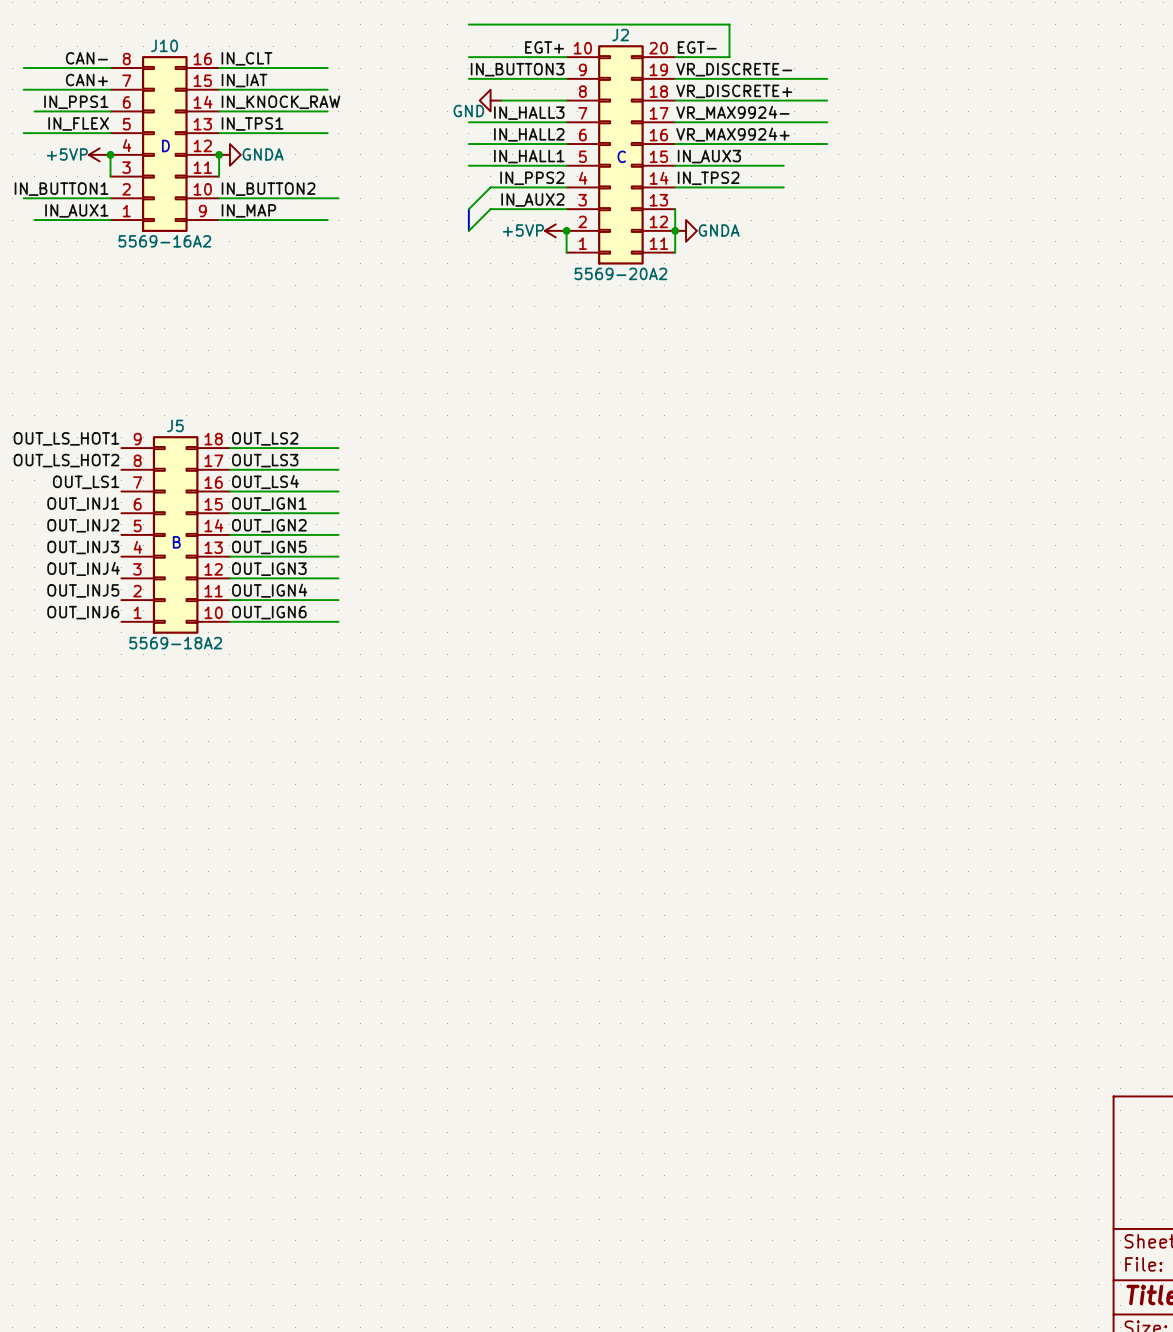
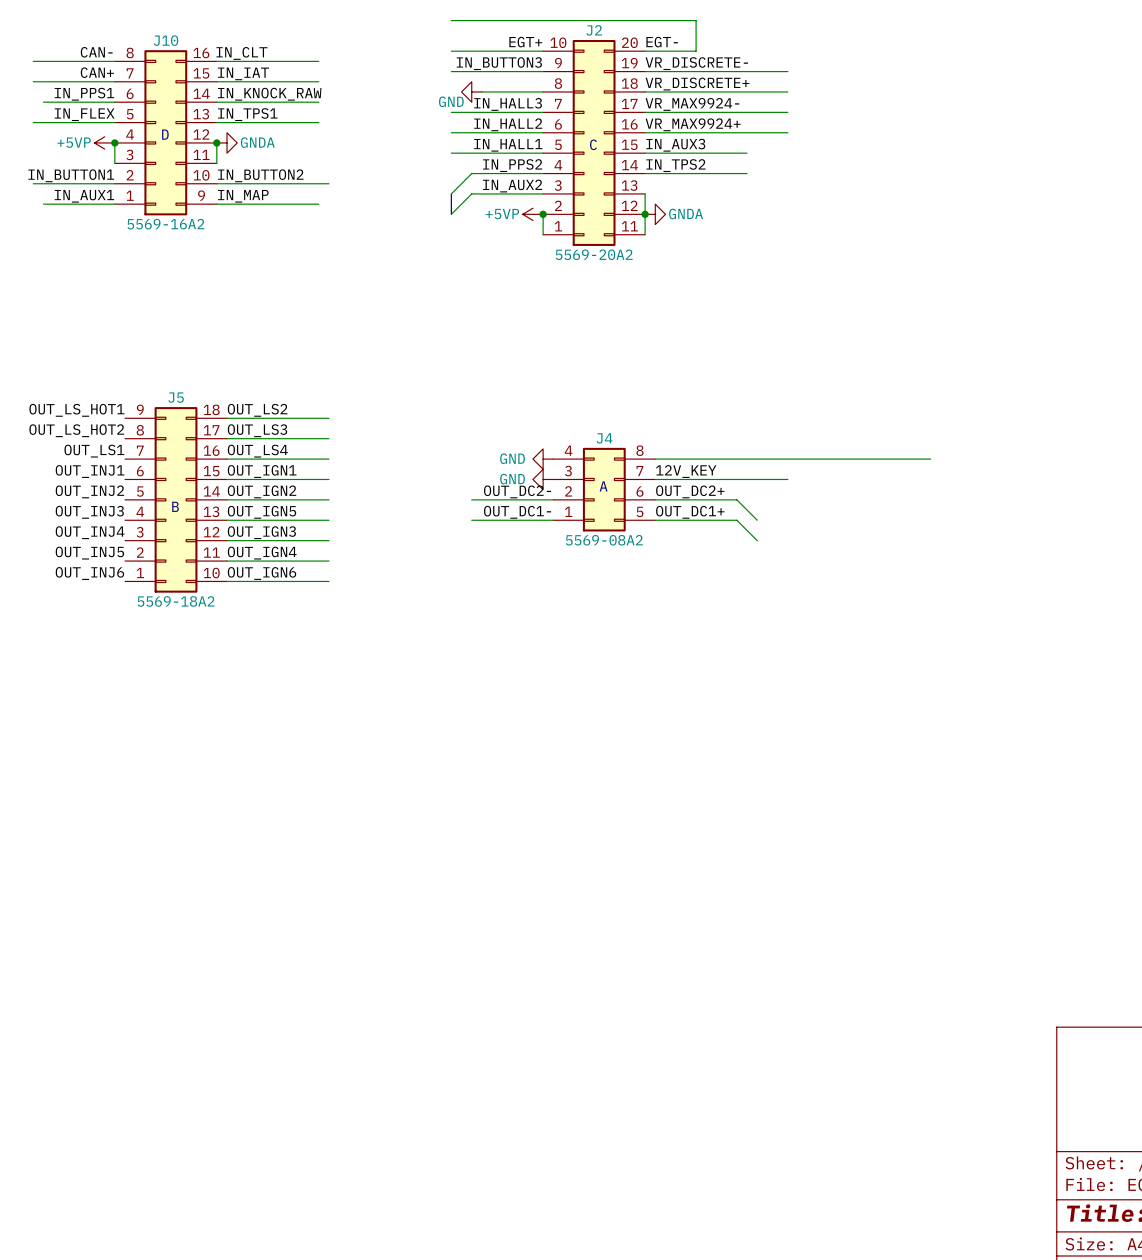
power symbol: none -> GND (543, 459)
wire: none -> (655, 459) (930, 459)
label: none -> 12V_KEY (686, 471)
power symbol: none -> GND (543, 479)
wire: none -> (655, 479) (787, 479)
text: none -> A (603, 486)
J4: none -> 5569-08A2 (604, 489)
label: none -> OUT_DC2- (517, 491)
label: none -> OUT_DC2+ (690, 491)
wire: none -> (471, 499) (553, 499)
wire: none -> (655, 499) (736, 499) (757, 520)
label: none -> OUT_DC1- (517, 512)
label: none -> OUT_DC1+ (690, 512)
wire: none -> (471, 520) (553, 520)
wire: none -> (655, 520) (736, 520) (757, 540)

